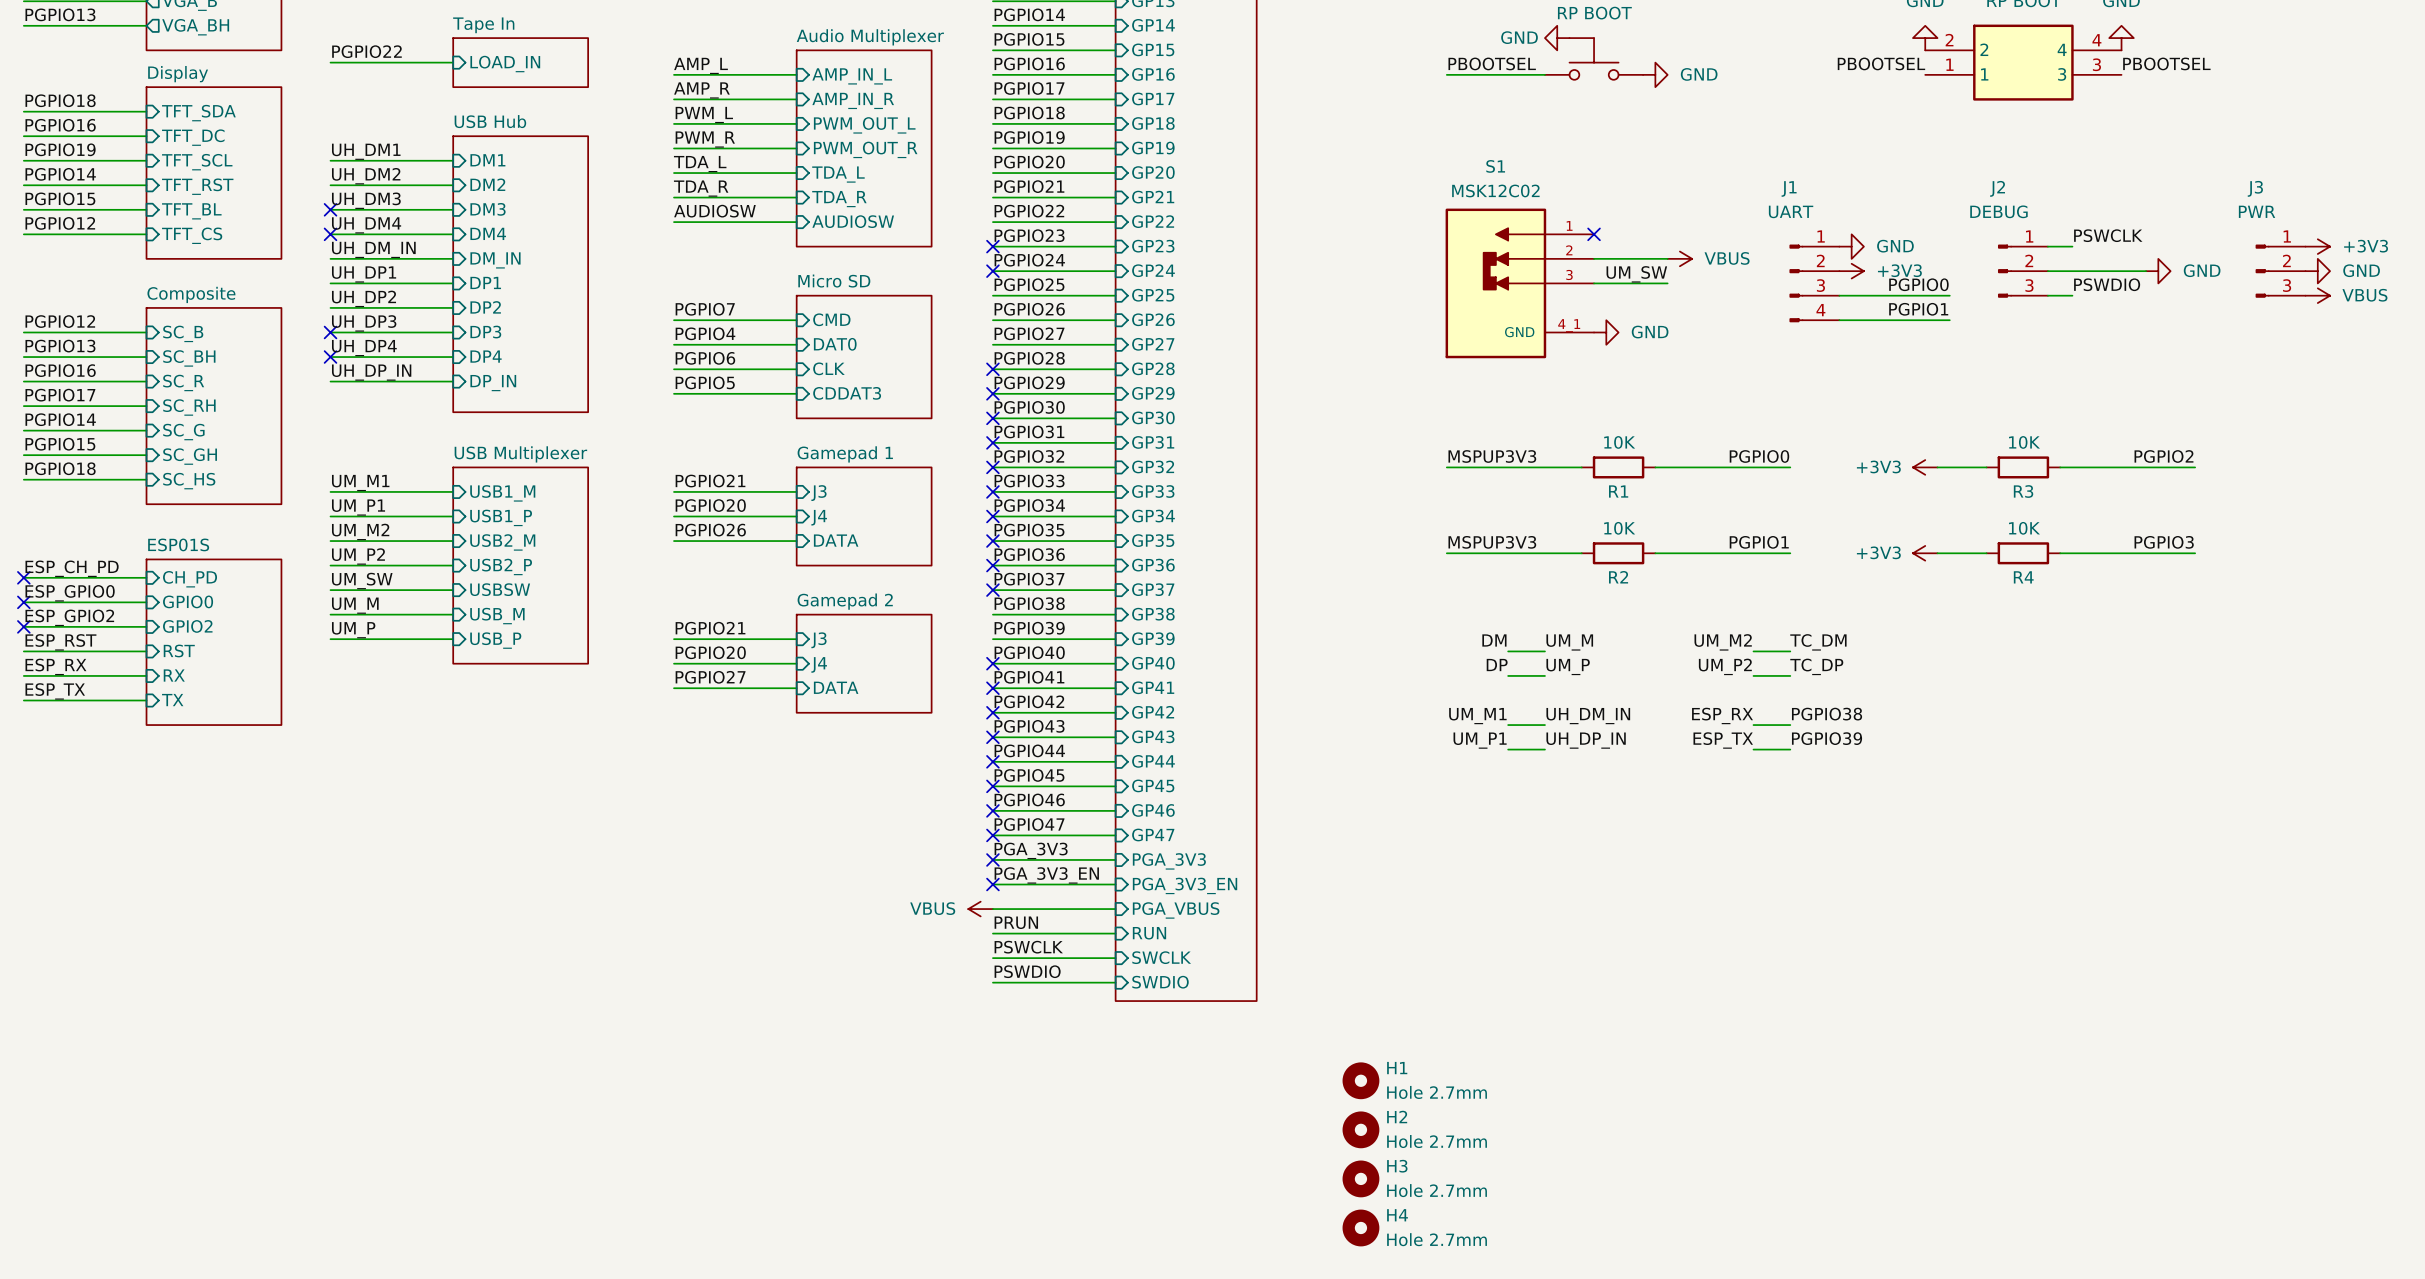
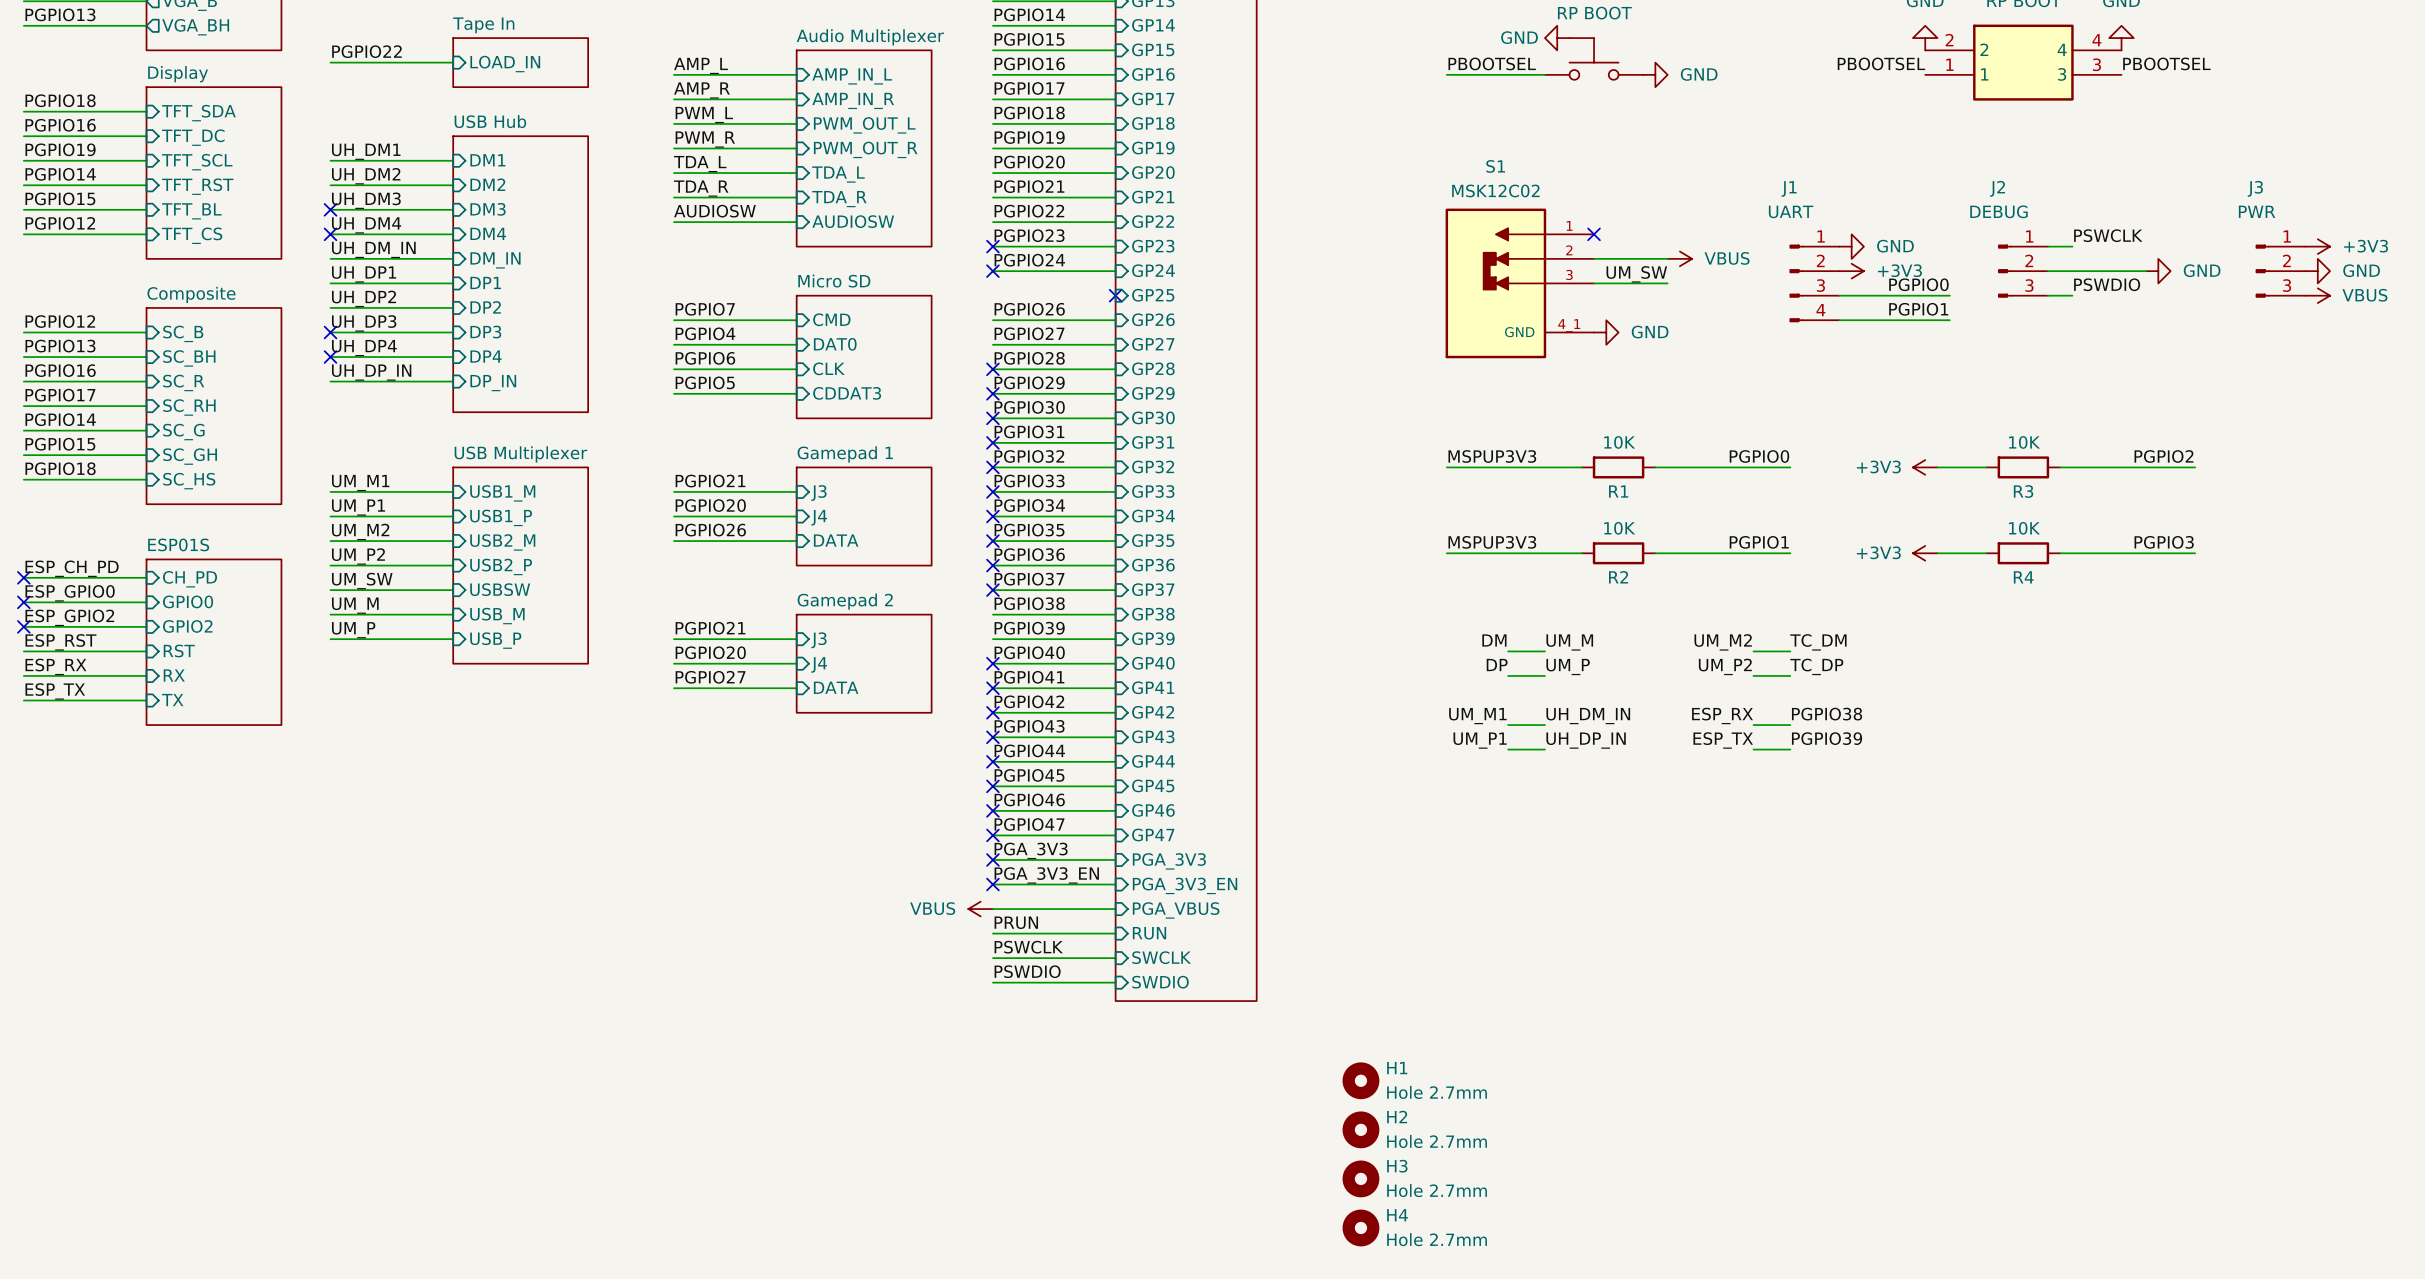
label: PGPIO25 (1029, 284) -> none
wire: (992, 295) (1115, 295) -> none
no-connect mark: none -> (1115, 295)

